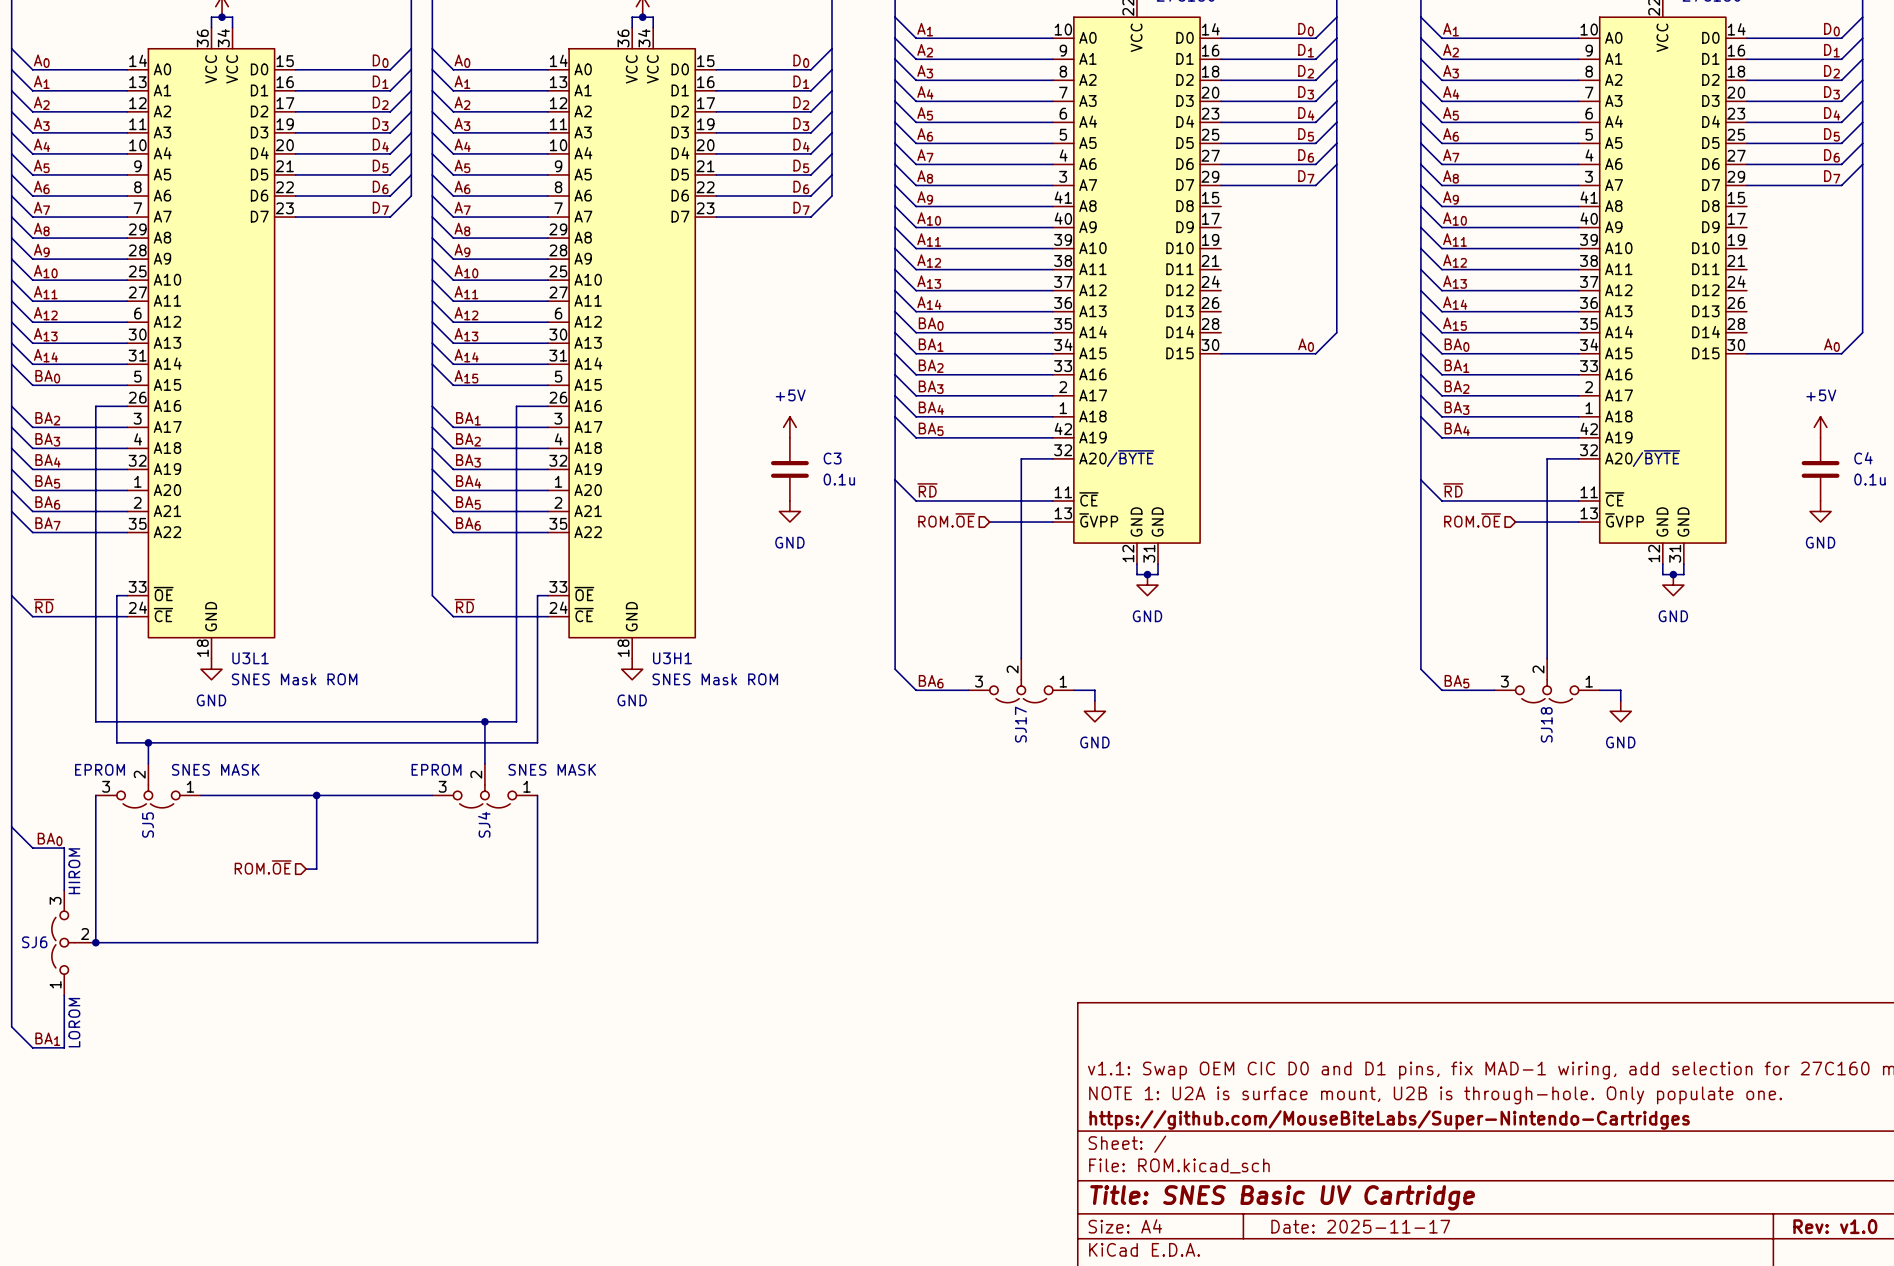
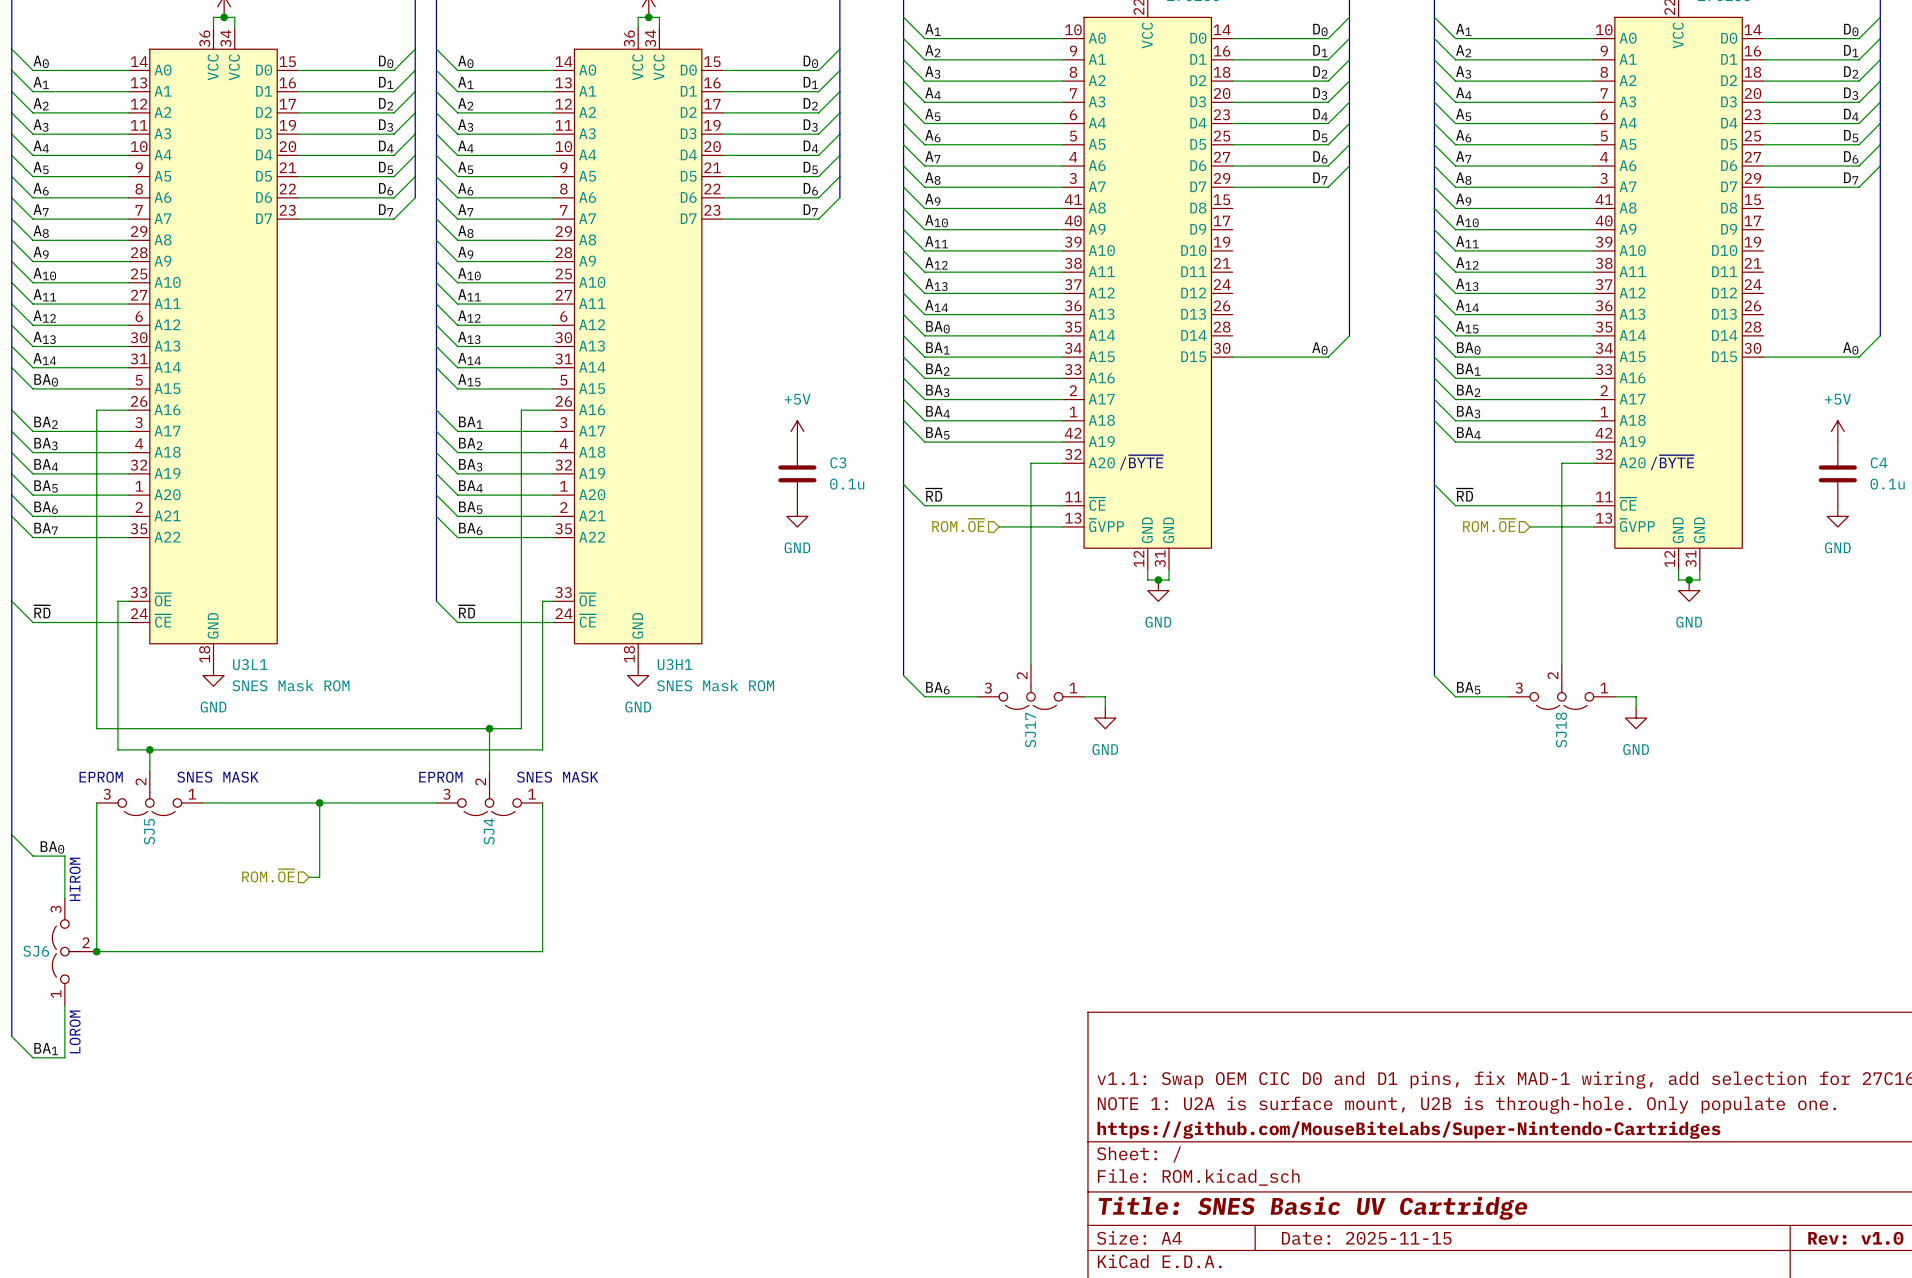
title block: Date: 2025-11-17 (1360, 1226) -> Date: 2025-11-15 (1366, 1238)

